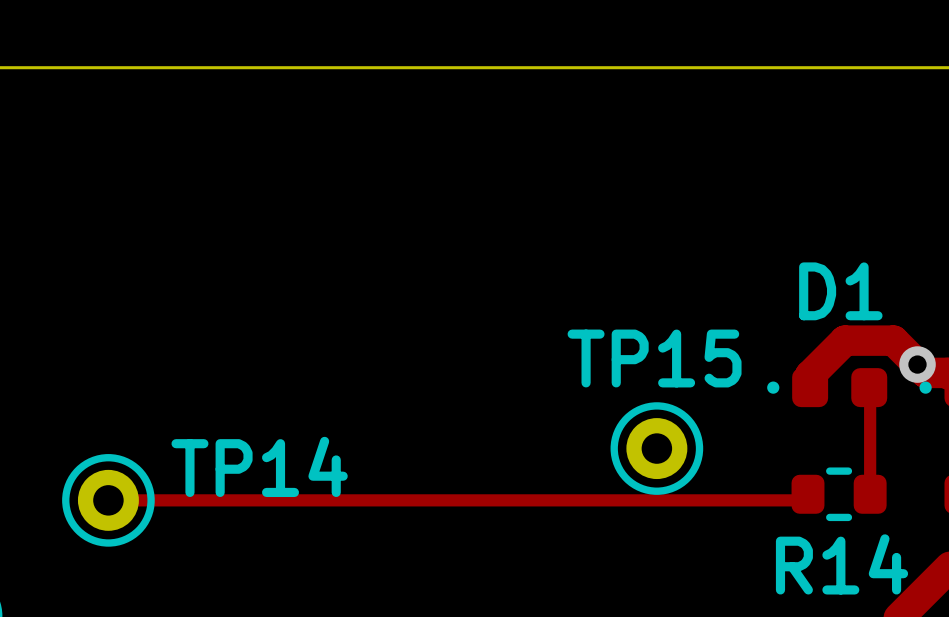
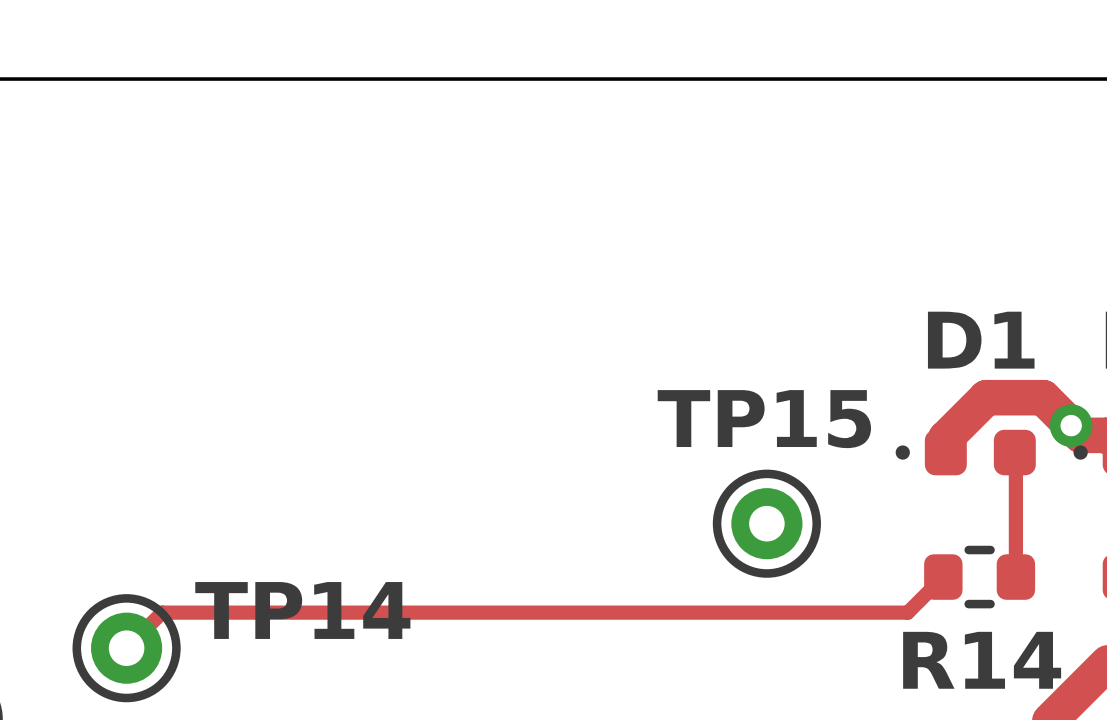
track: (108, 500) (801, 500) -> (126, 648) (162, 612) (907, 612) (936, 584)
TP14 position: (108, 500) -> (126, 648)

